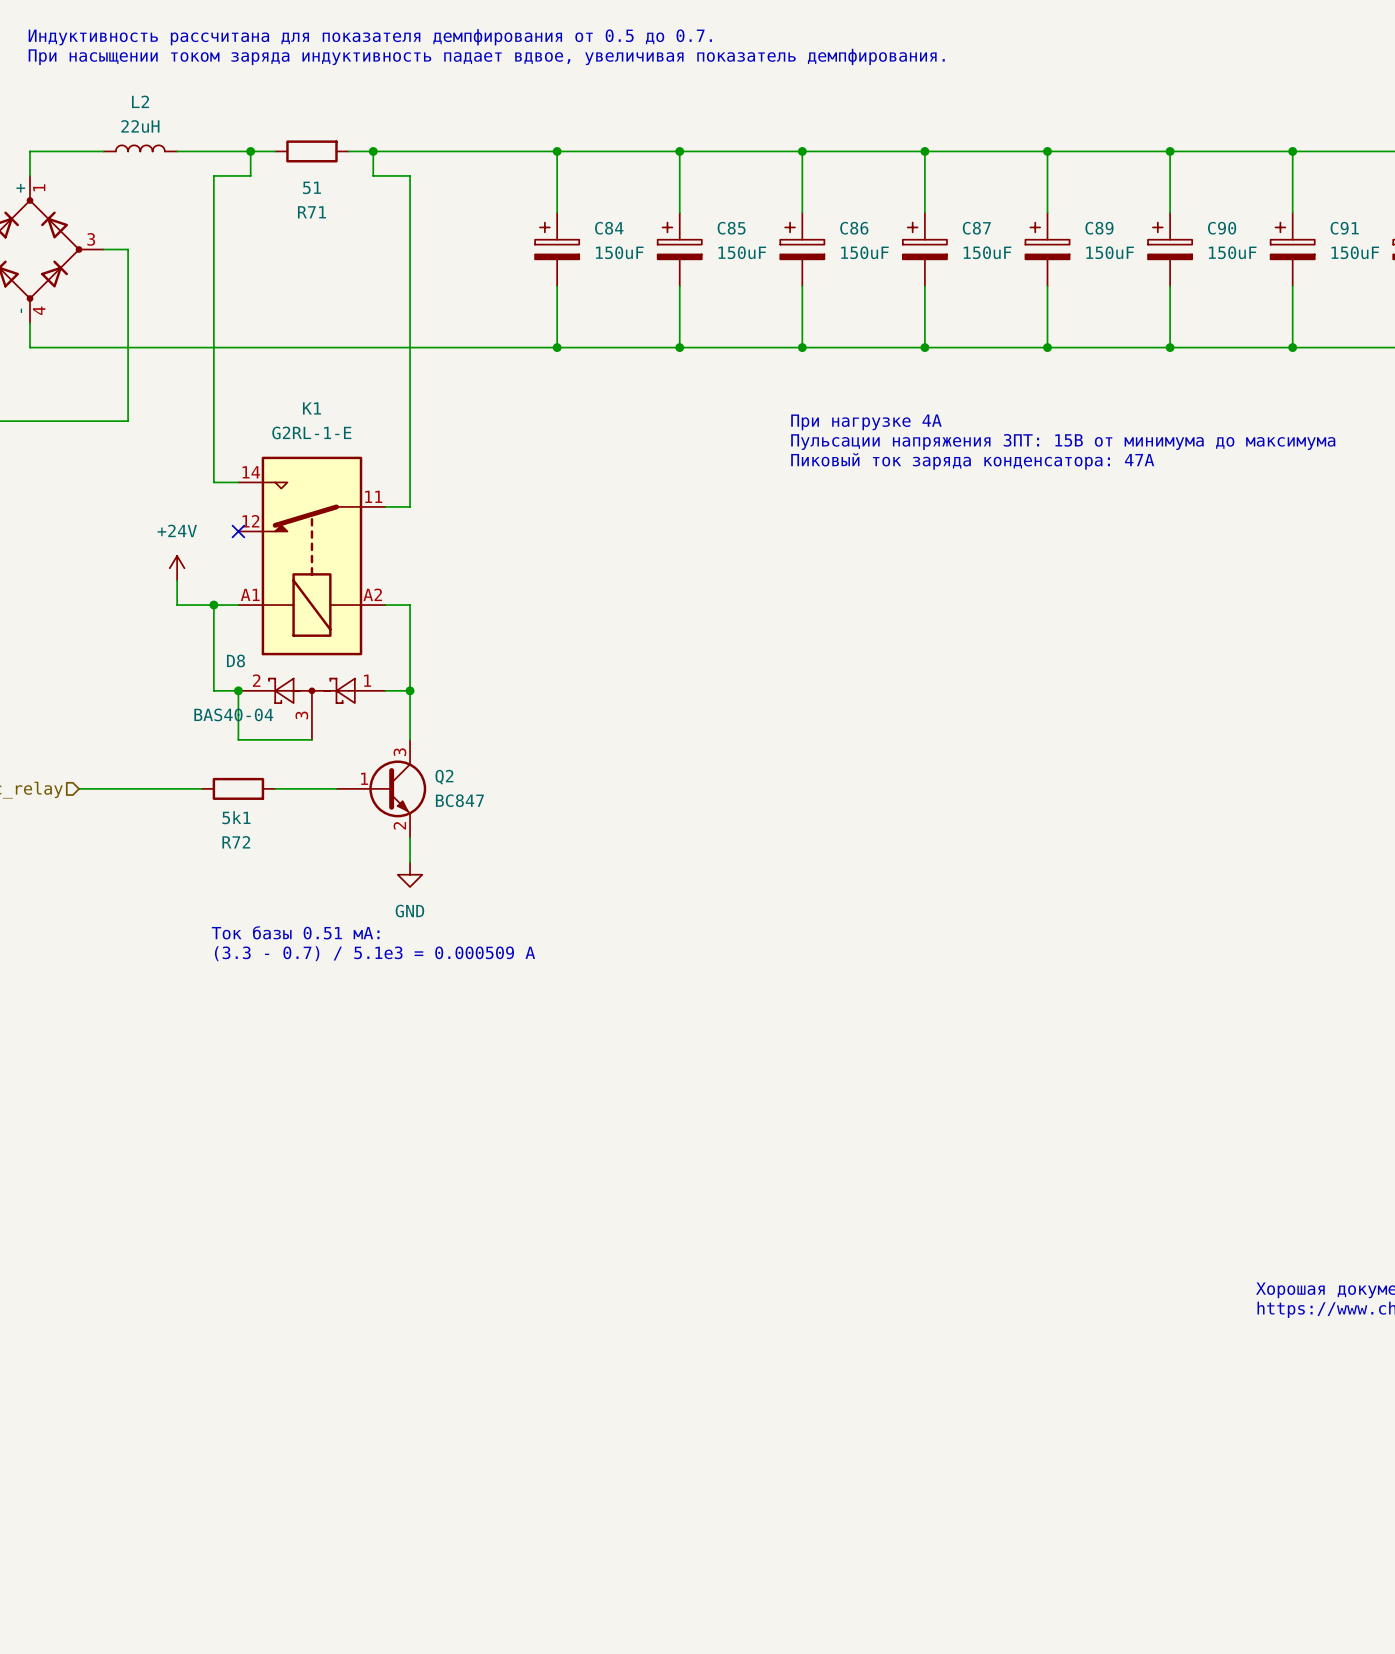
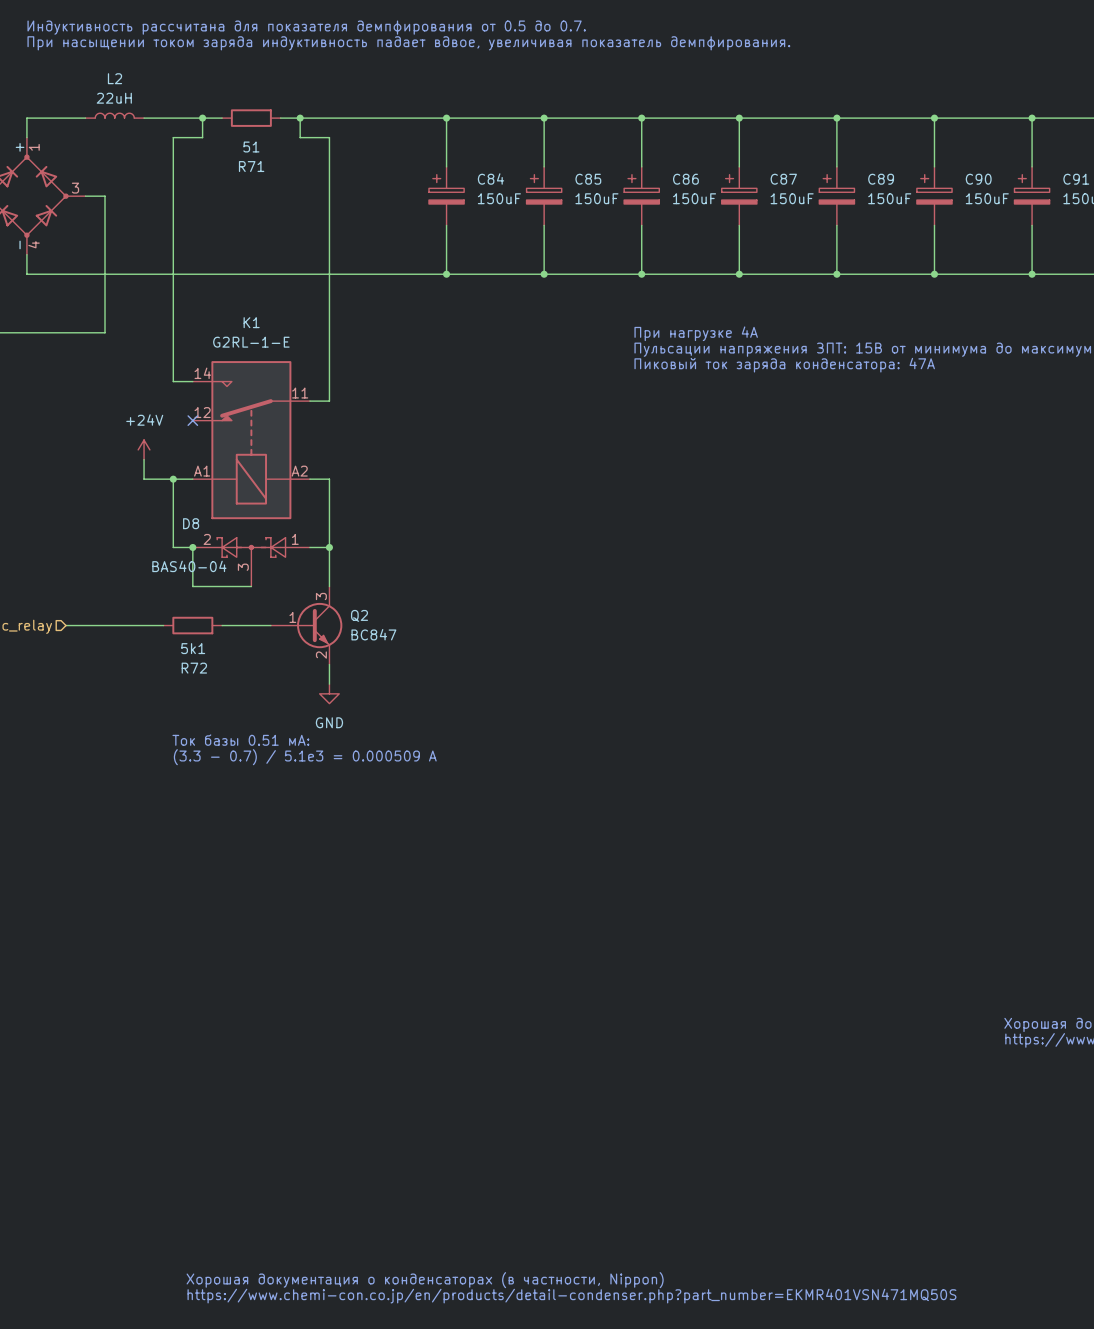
text: none -> Хорошая документация о конденсаторах (в частности, Nippon) (425, 1280)
text: none -> https://www.chemi-con.co.jp/en/products/detail-condenser.php?part_number=EKMR401VSN471MQ50S (571, 1296)

